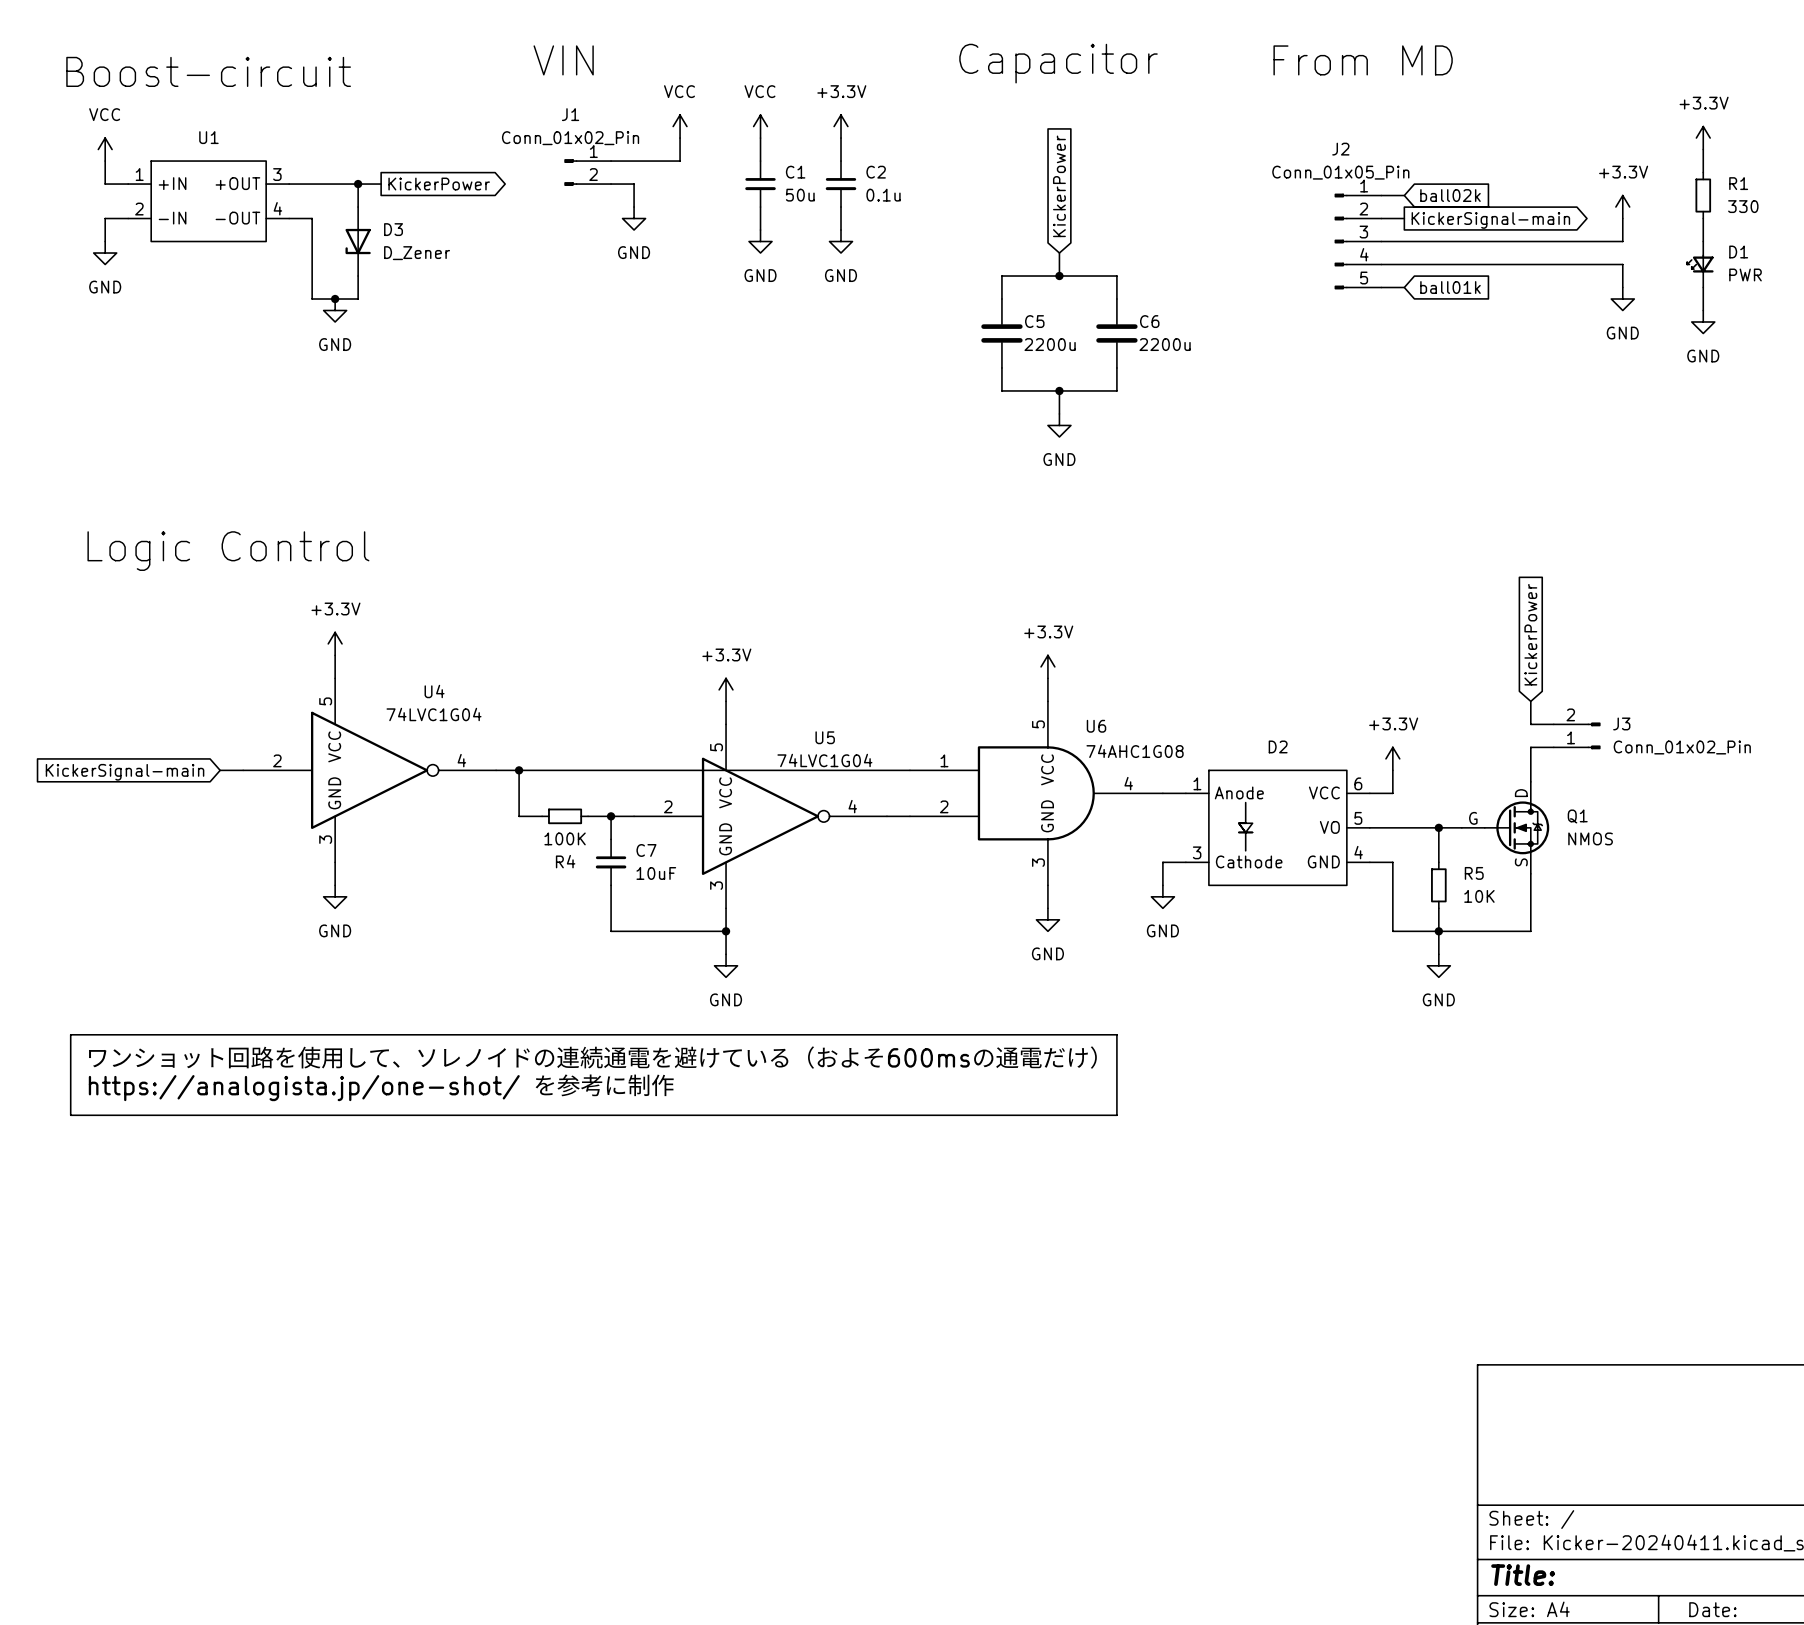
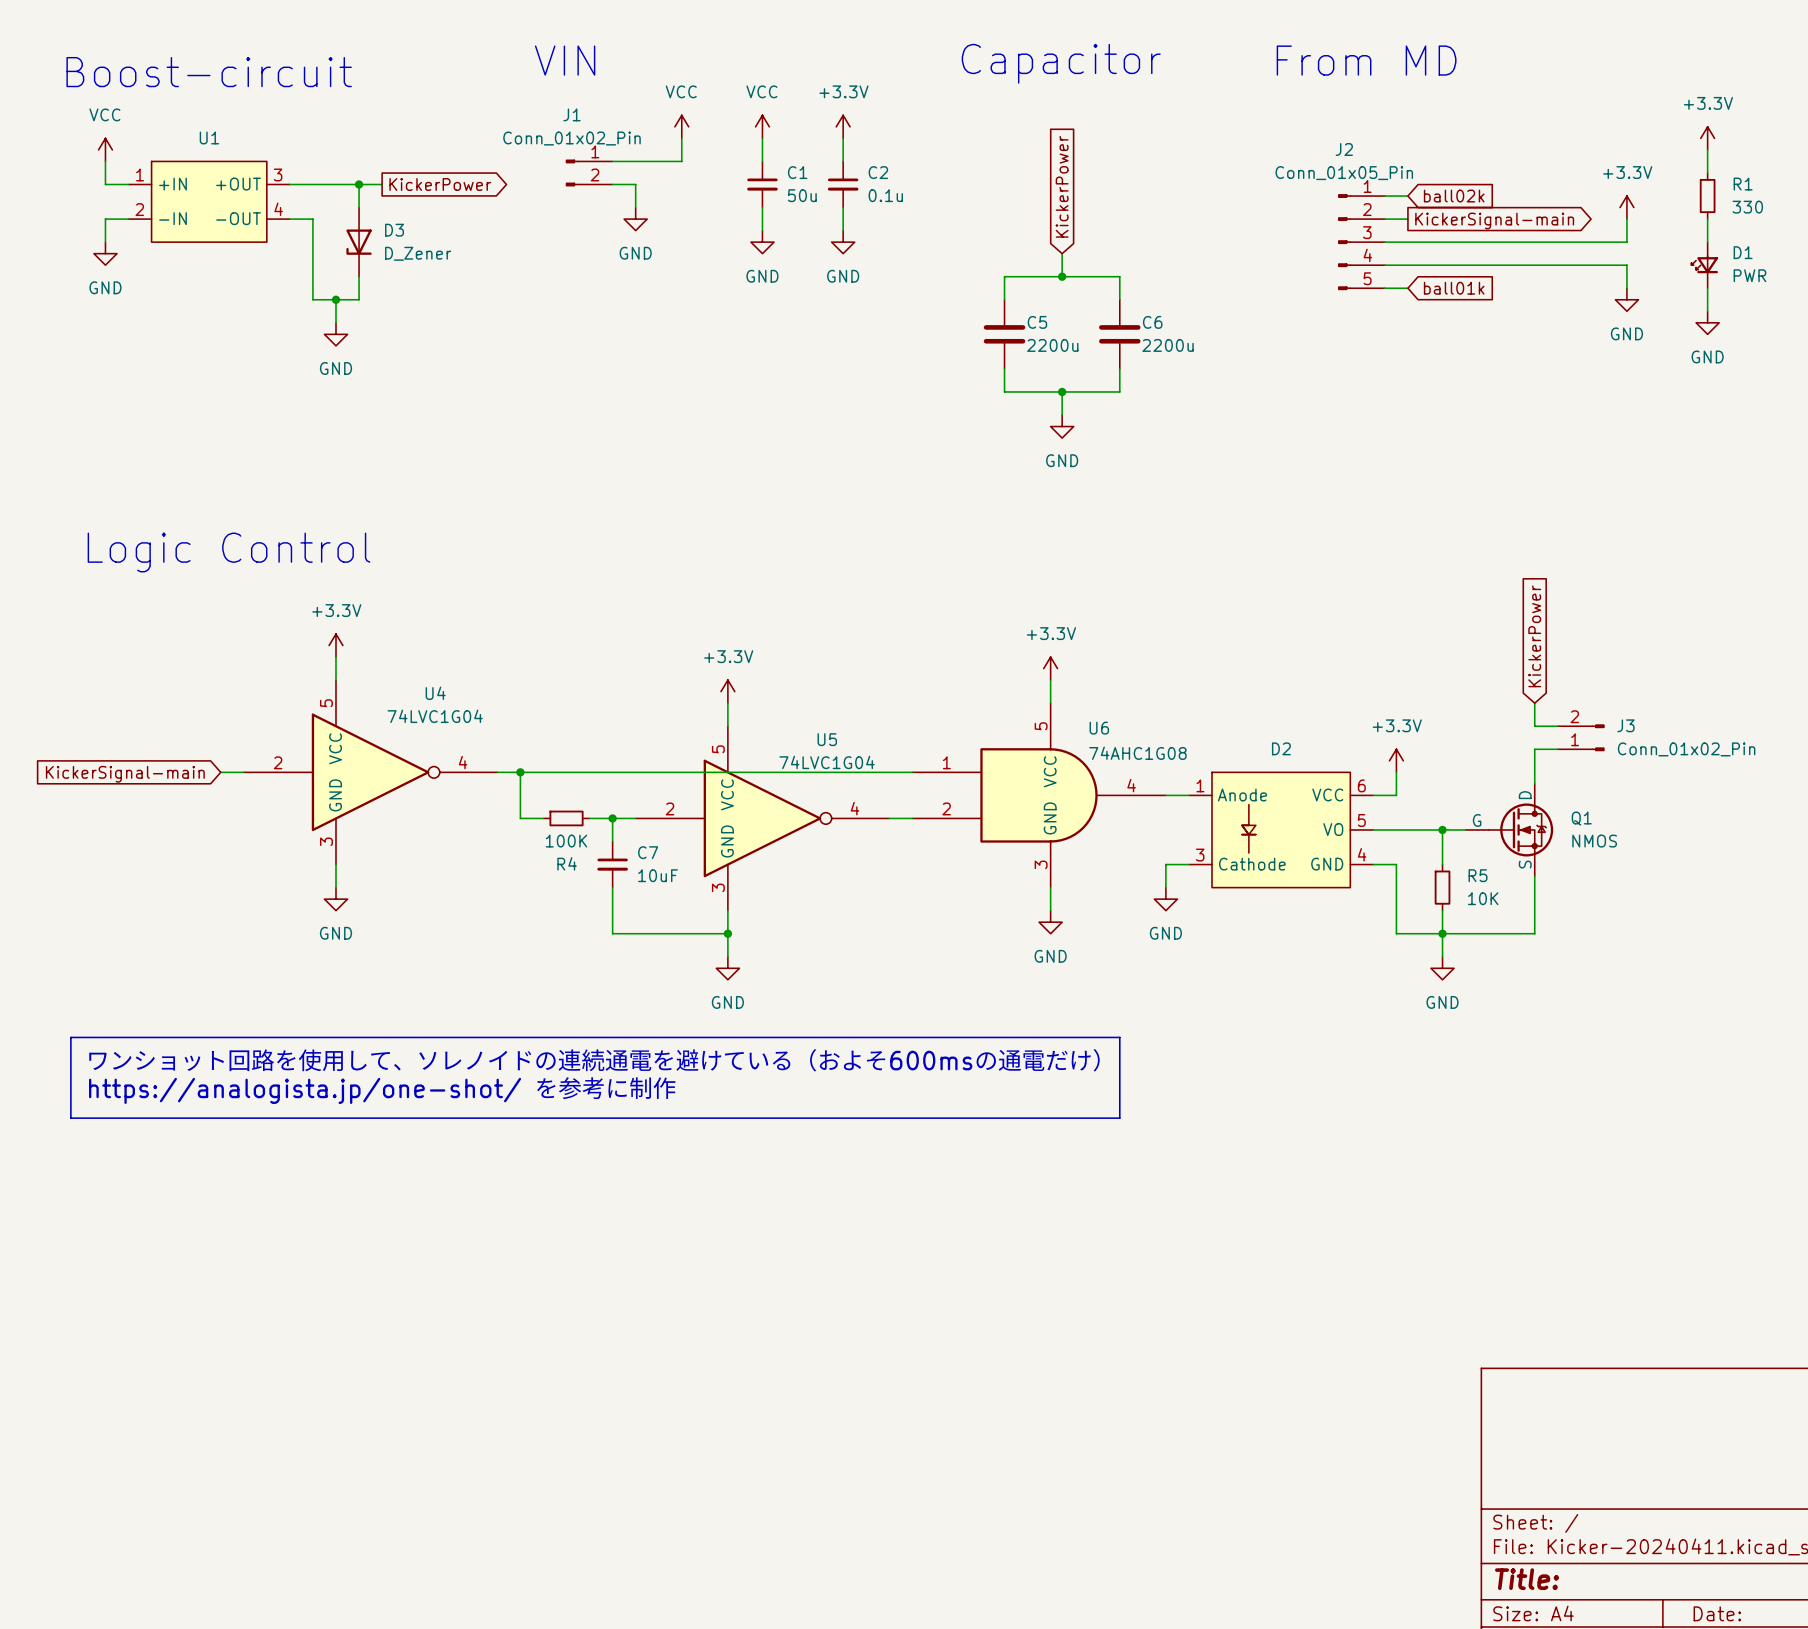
power symbol position: GND (335, 310) -> GND (335, 334)

